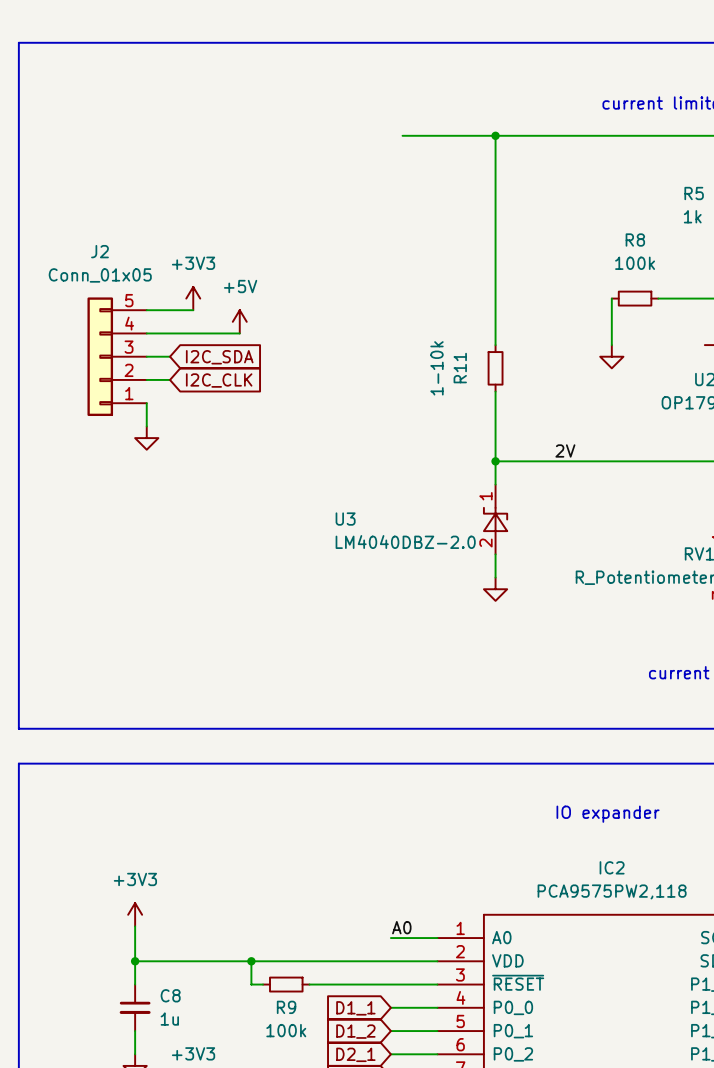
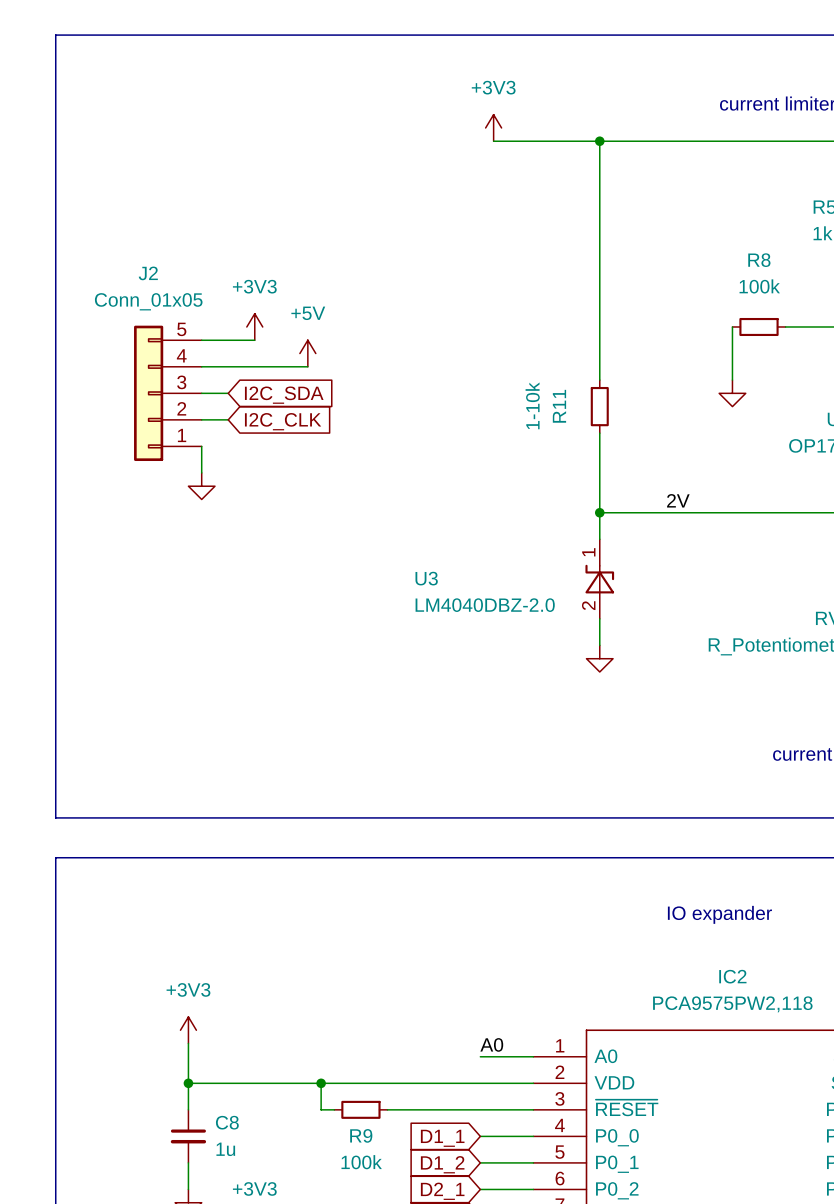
power symbol: none -> +3V3 (493, 127)

